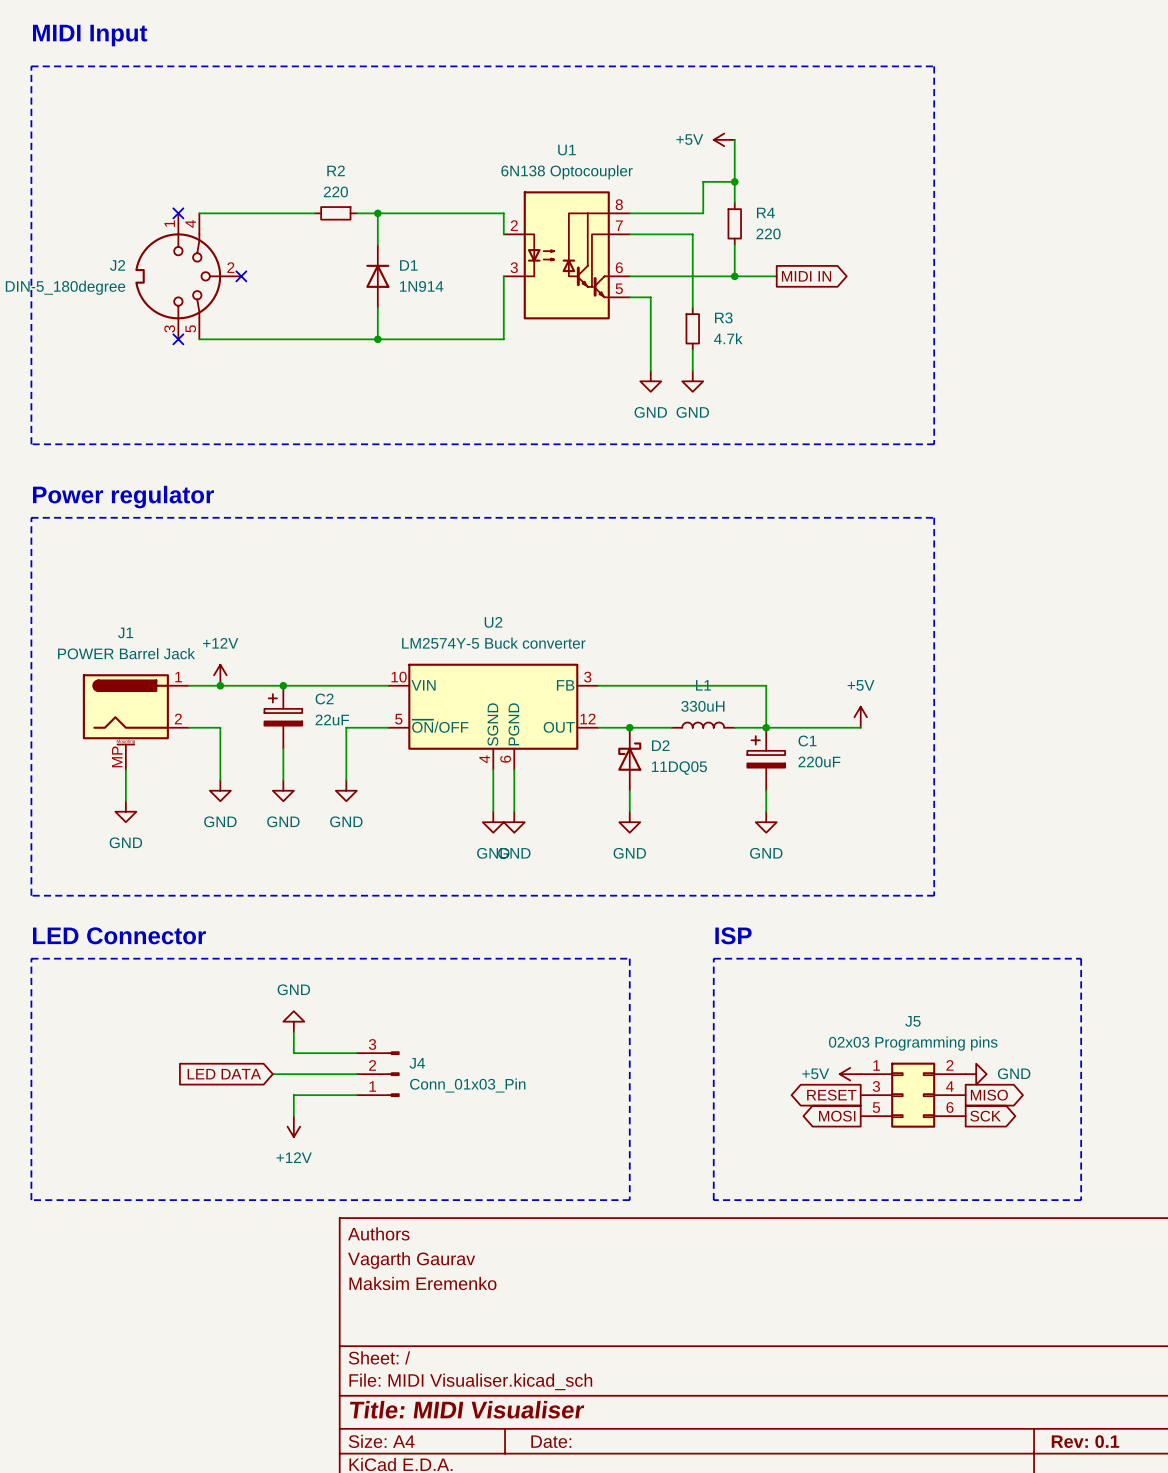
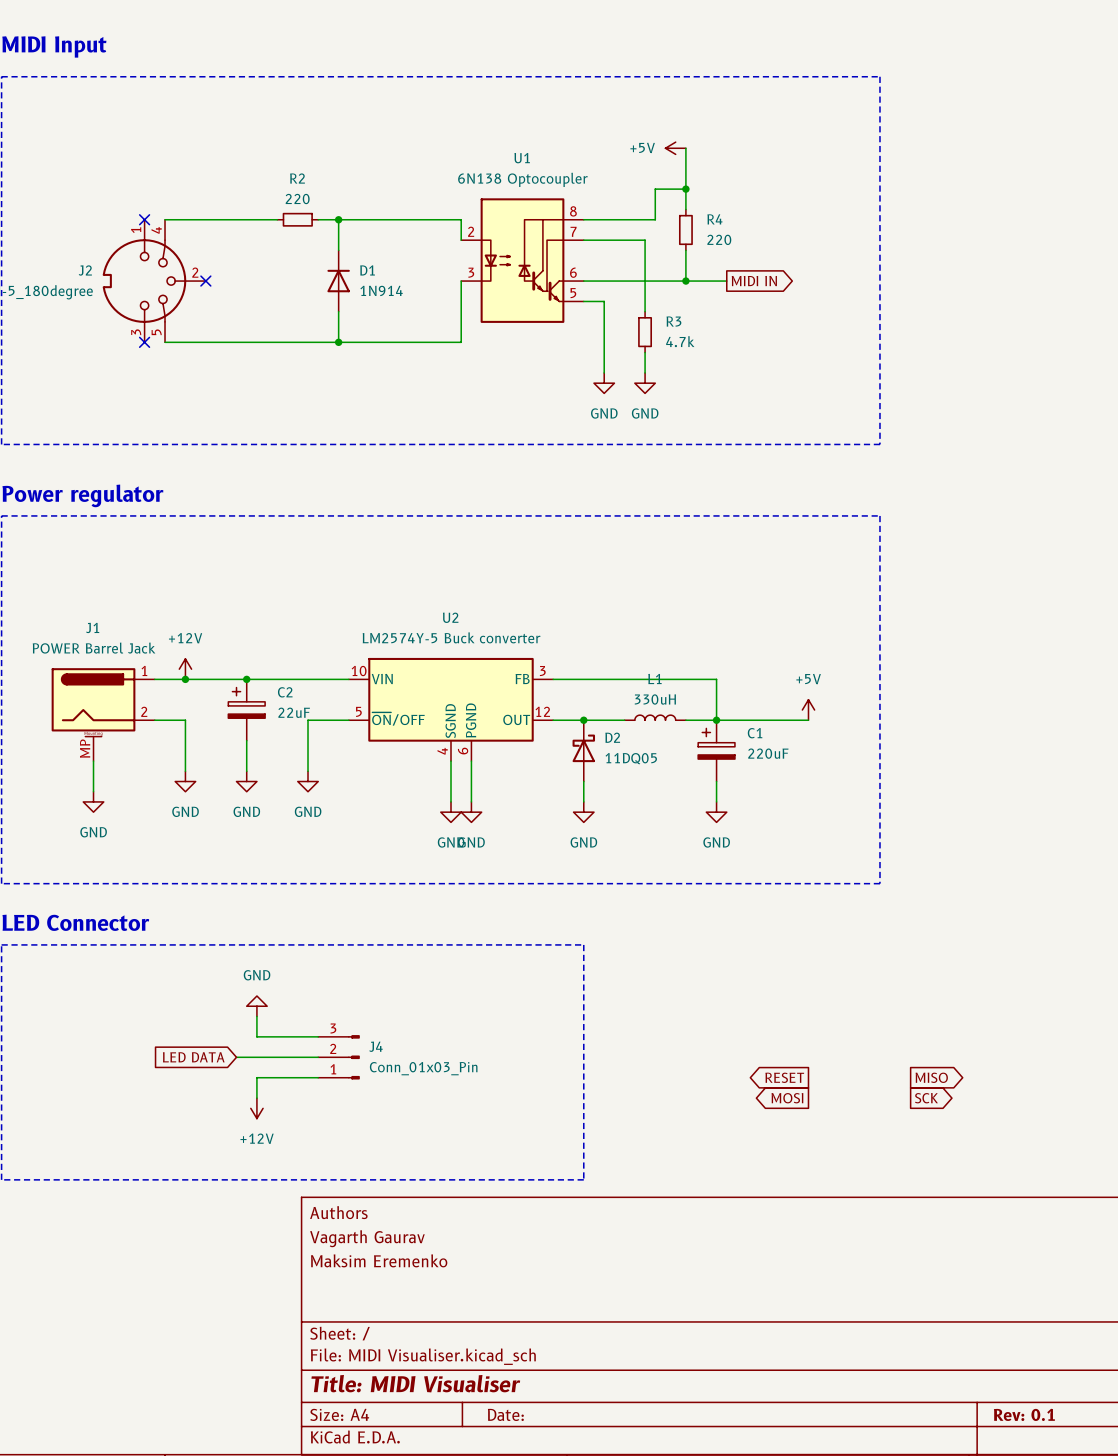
text: ISP (733, 935) -> none
line: (713, 958) (1081, 958) (1081, 1200) (713, 1200) (713, 958) -> none
power symbol: +5V (850, 1074) -> none
power symbol: GND (976, 1074) -> none
J5: 02x03 Programming pins (913, 1095) -> none

